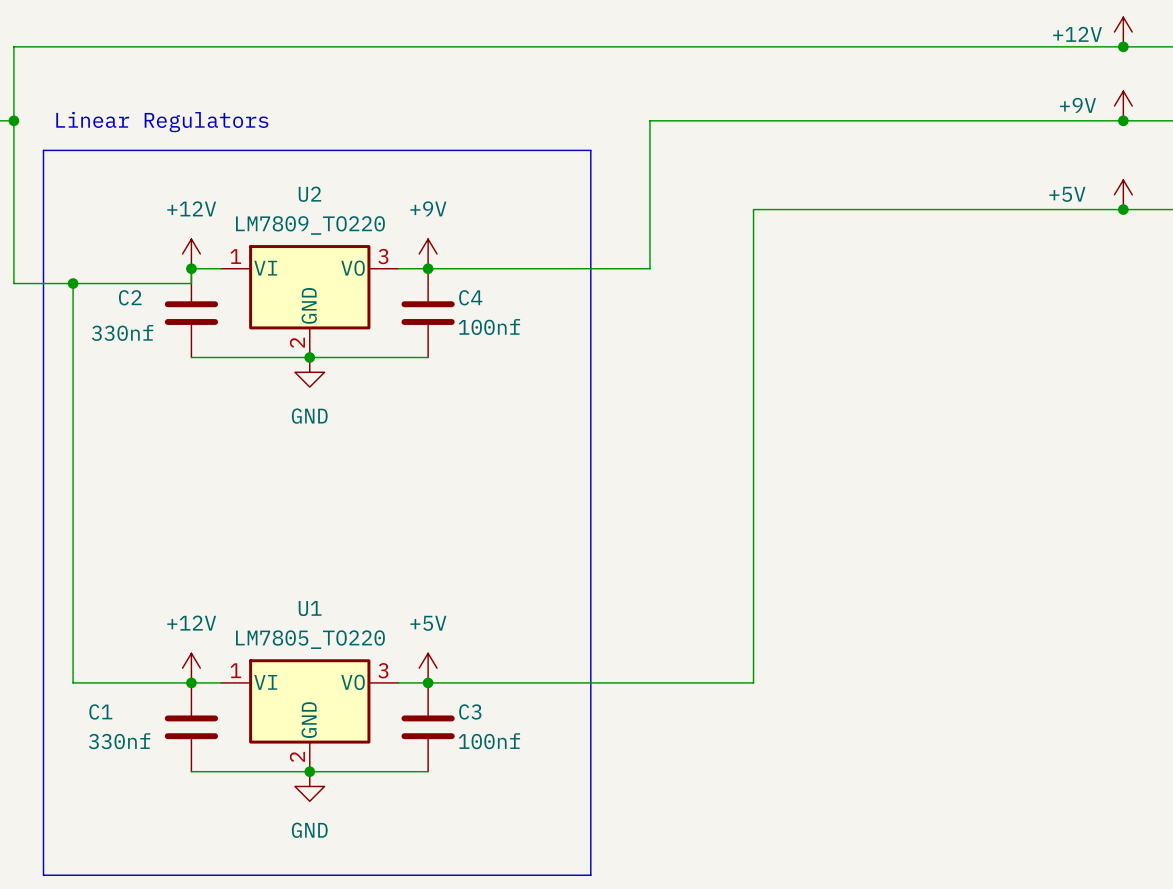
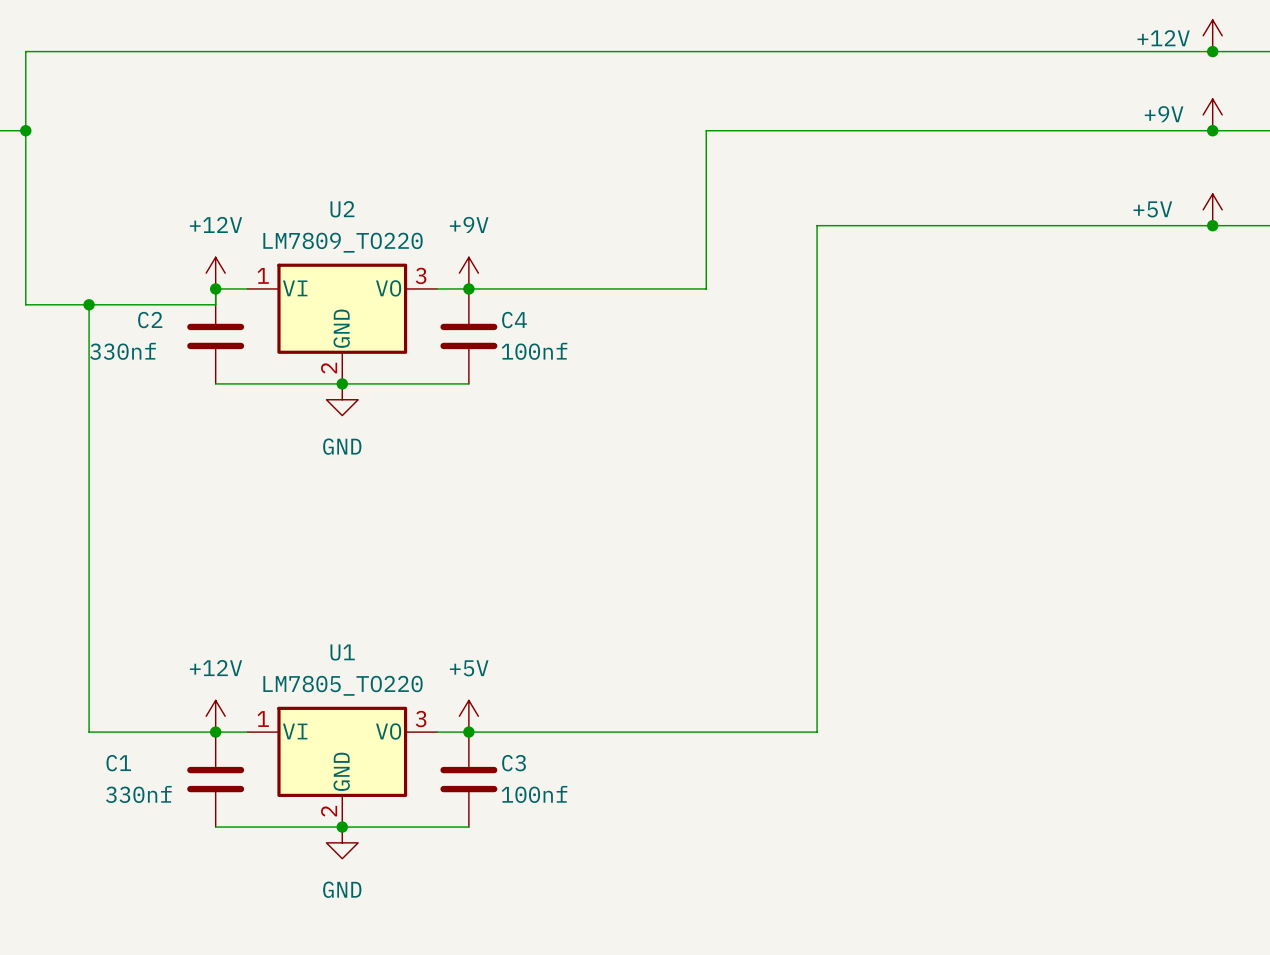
text: Linear Regulators (162, 122) -> none
line: (43, 150) (590, 150) (590, 875) (43, 875) (43, 150) -> none
C2 value position: 330nf (122, 332) -> 330nf (122, 351)

